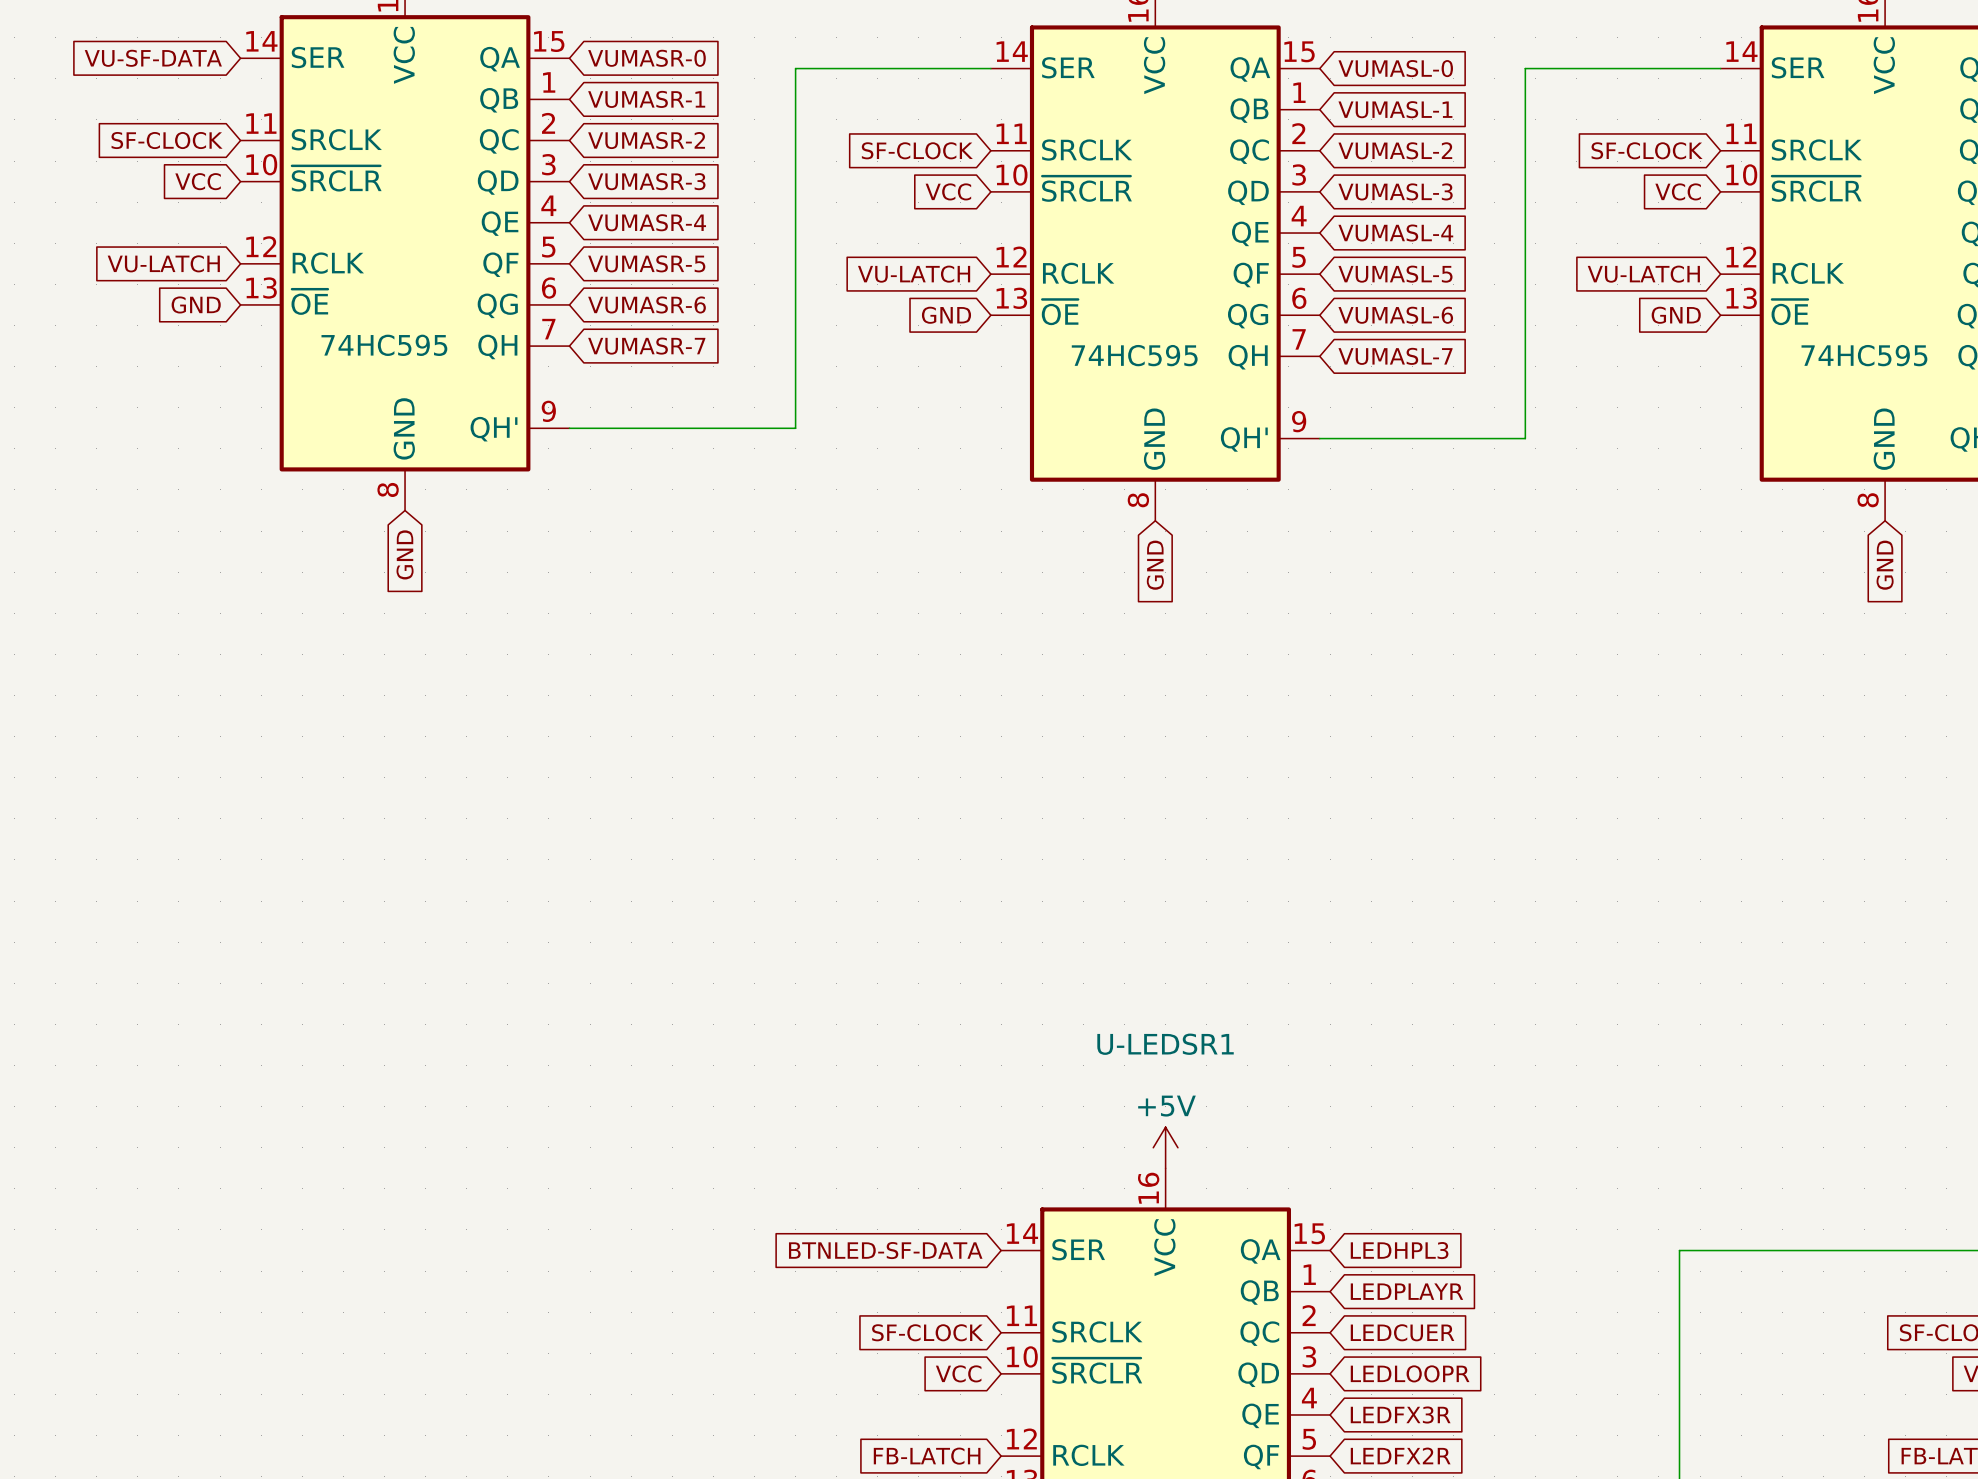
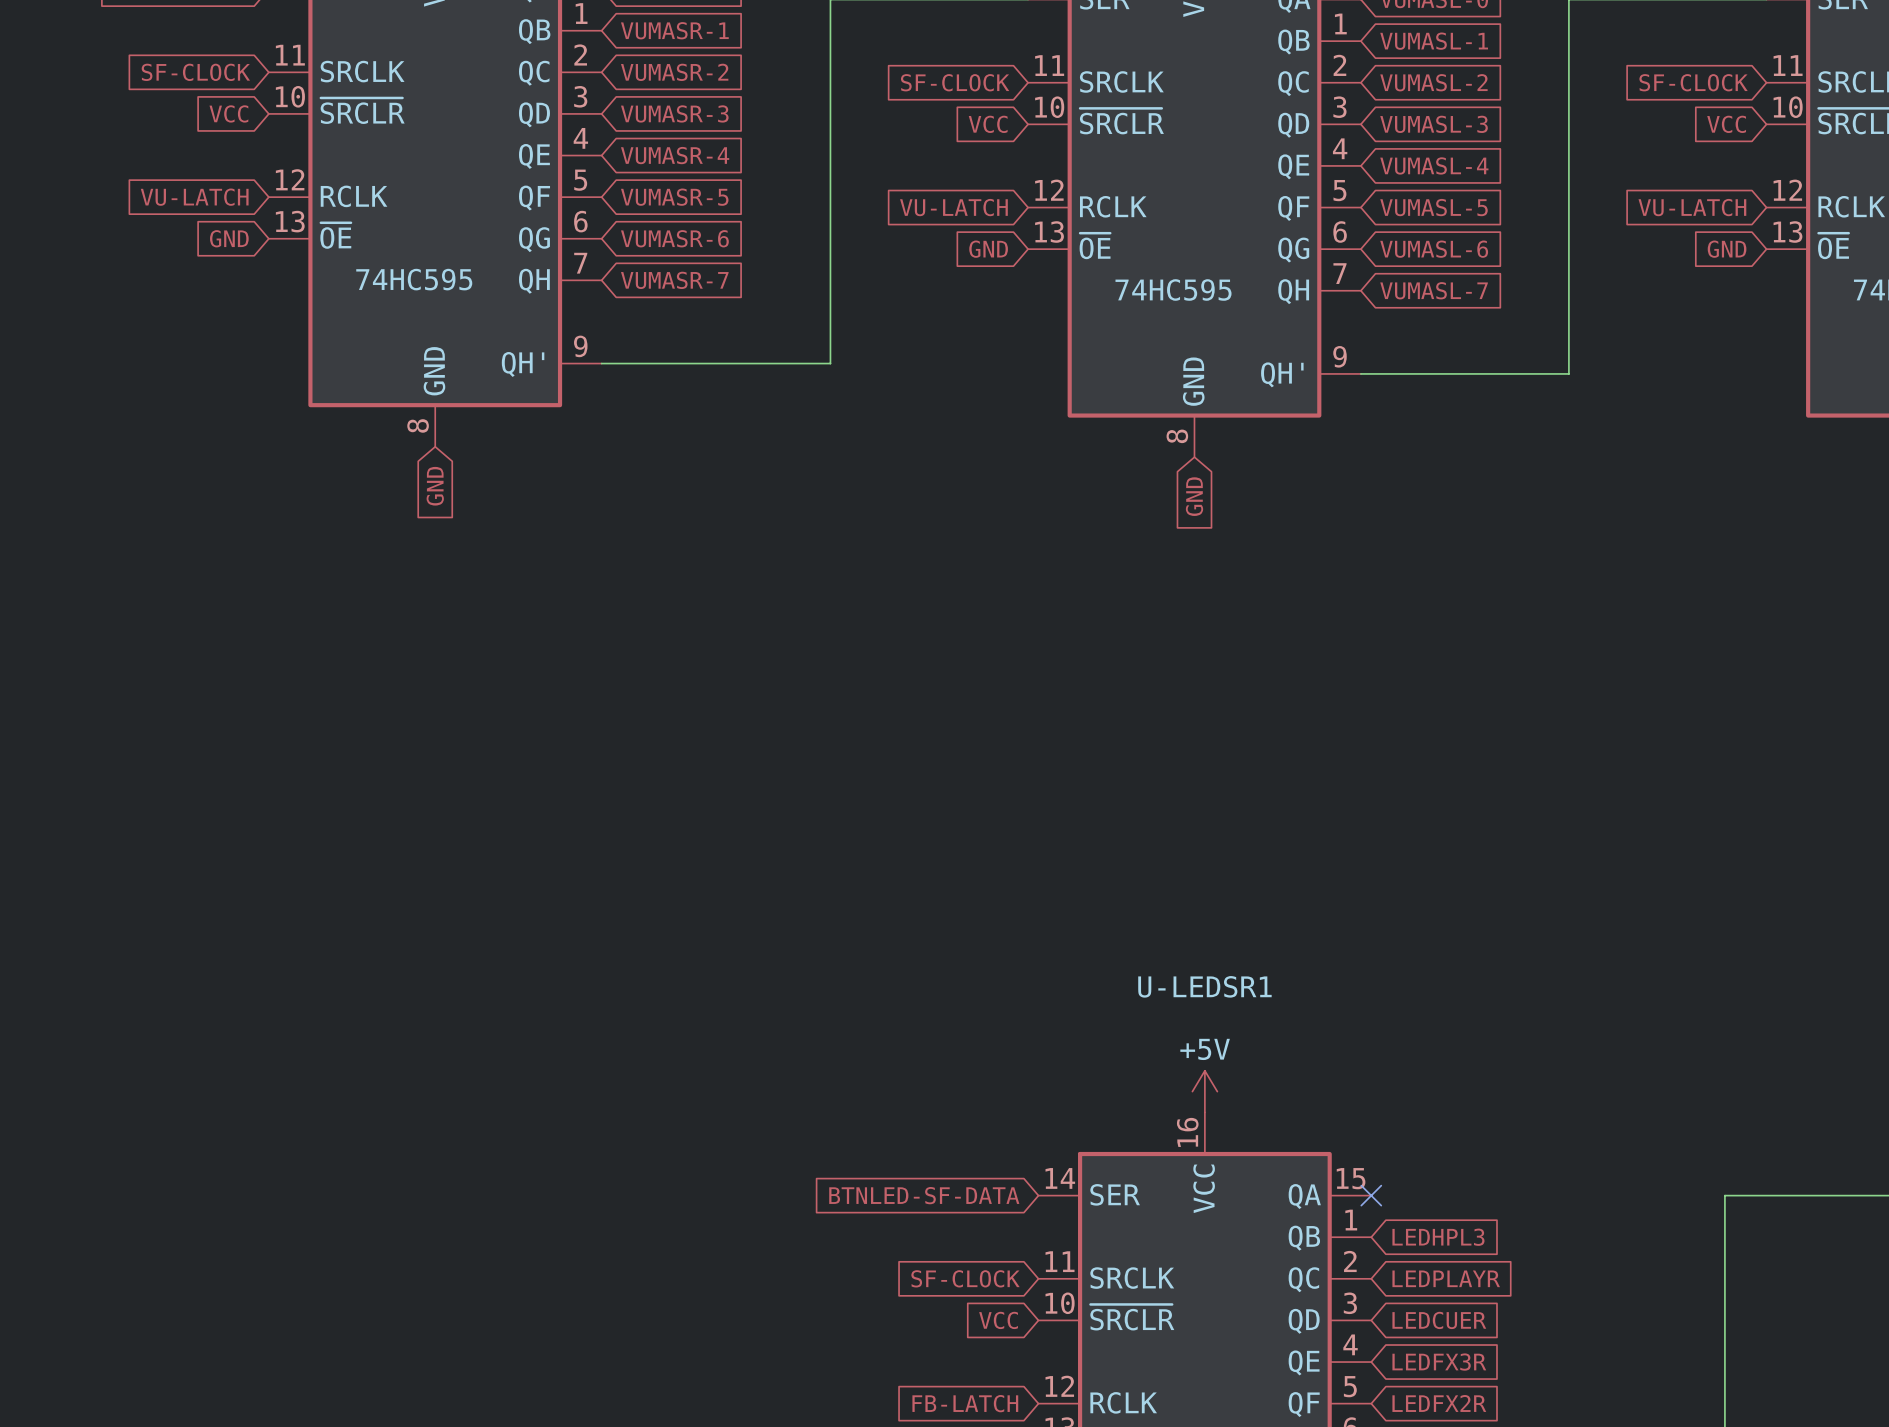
no-connect mark: none -> (1371, 1195)
global label: LEDHPL3 (1399, 1250) -> none
global label: LEDPLAYR (1406, 1291) -> LEDHPL3 (1438, 1237)
global label: LEDCUER (1402, 1332) -> LEDPLAYR (1446, 1278)
global label: LEDLOOPR (1410, 1373) -> LEDCUER (1439, 1320)

